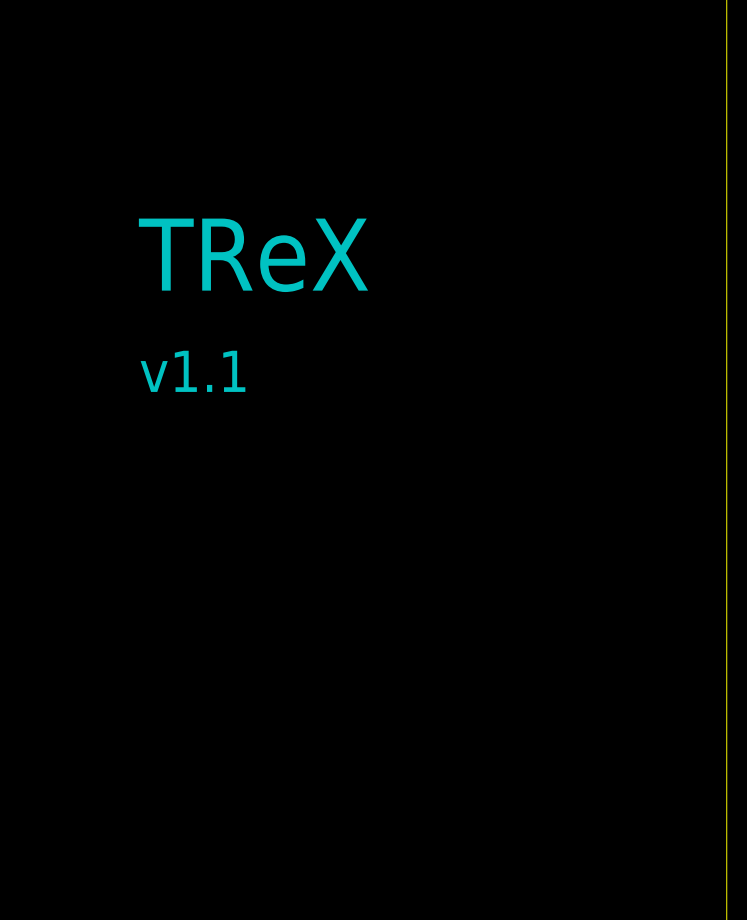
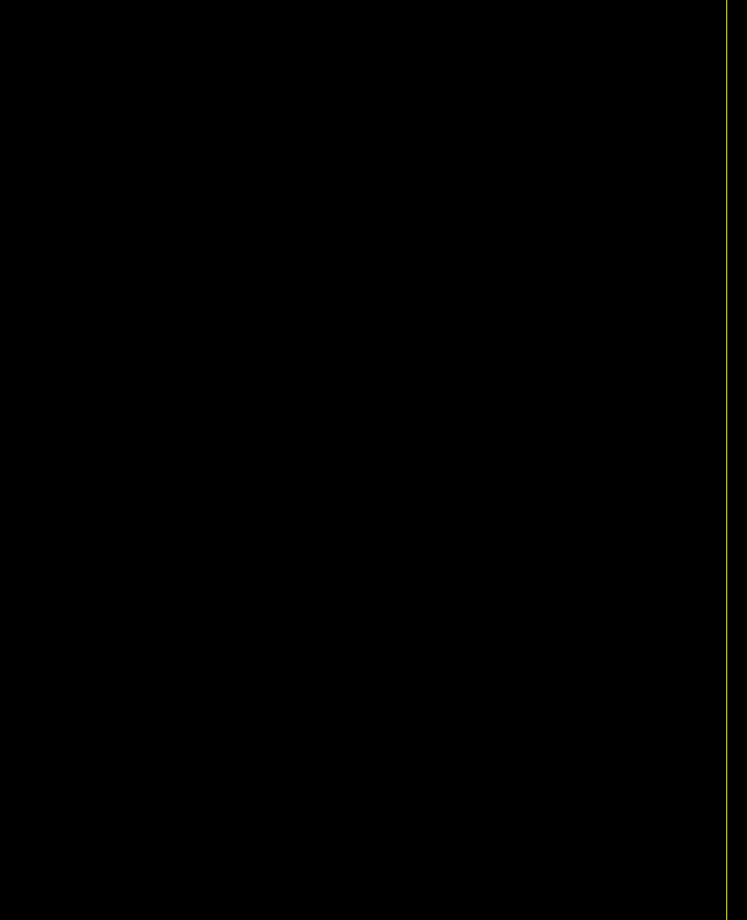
text: TReX (253, 255) -> none
text: v1.1 (193, 371) -> none

